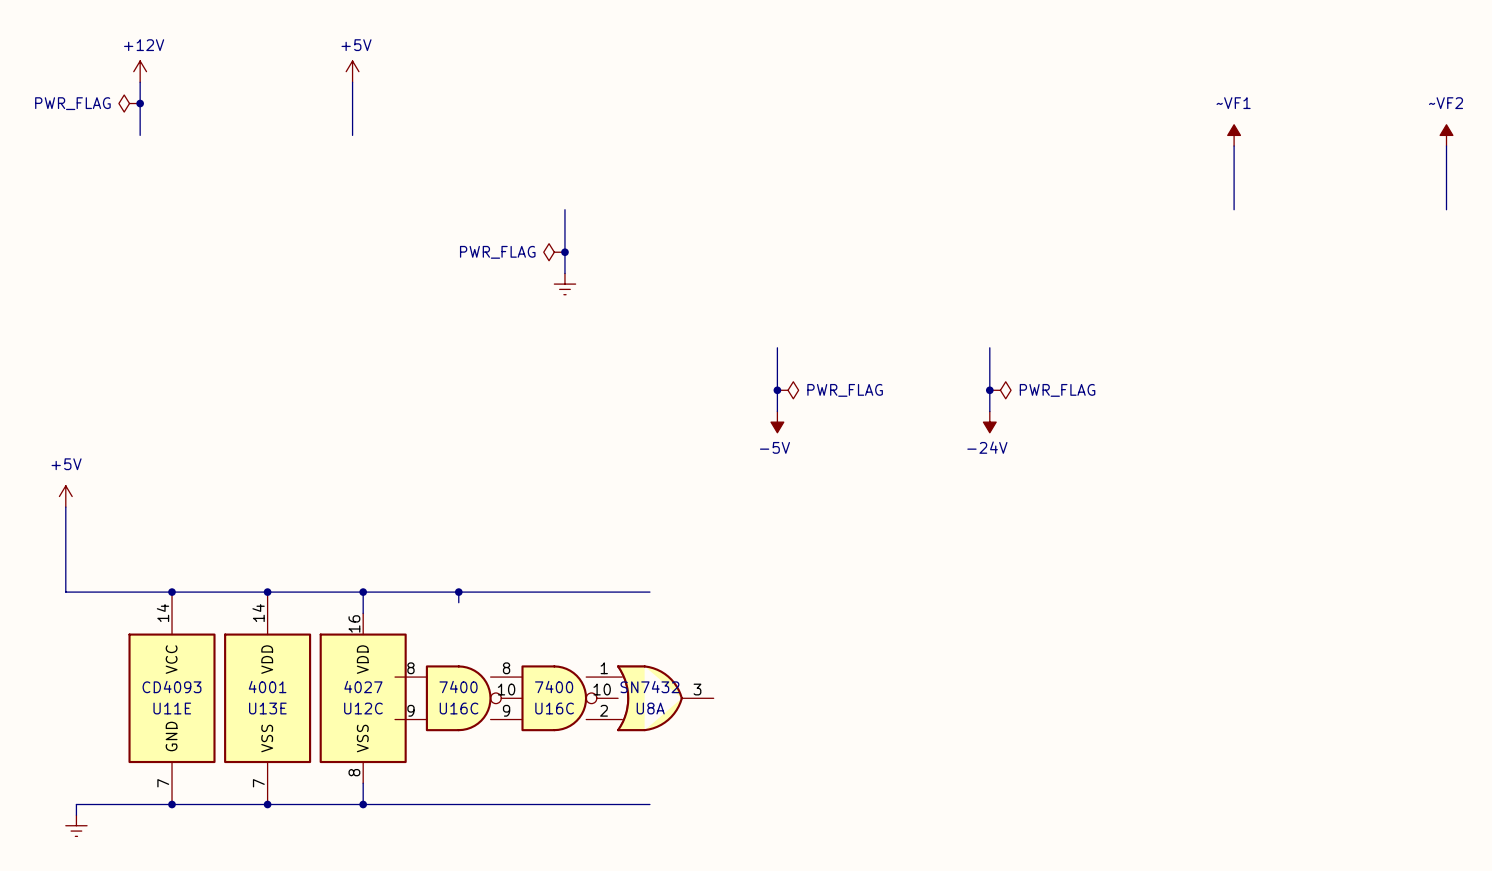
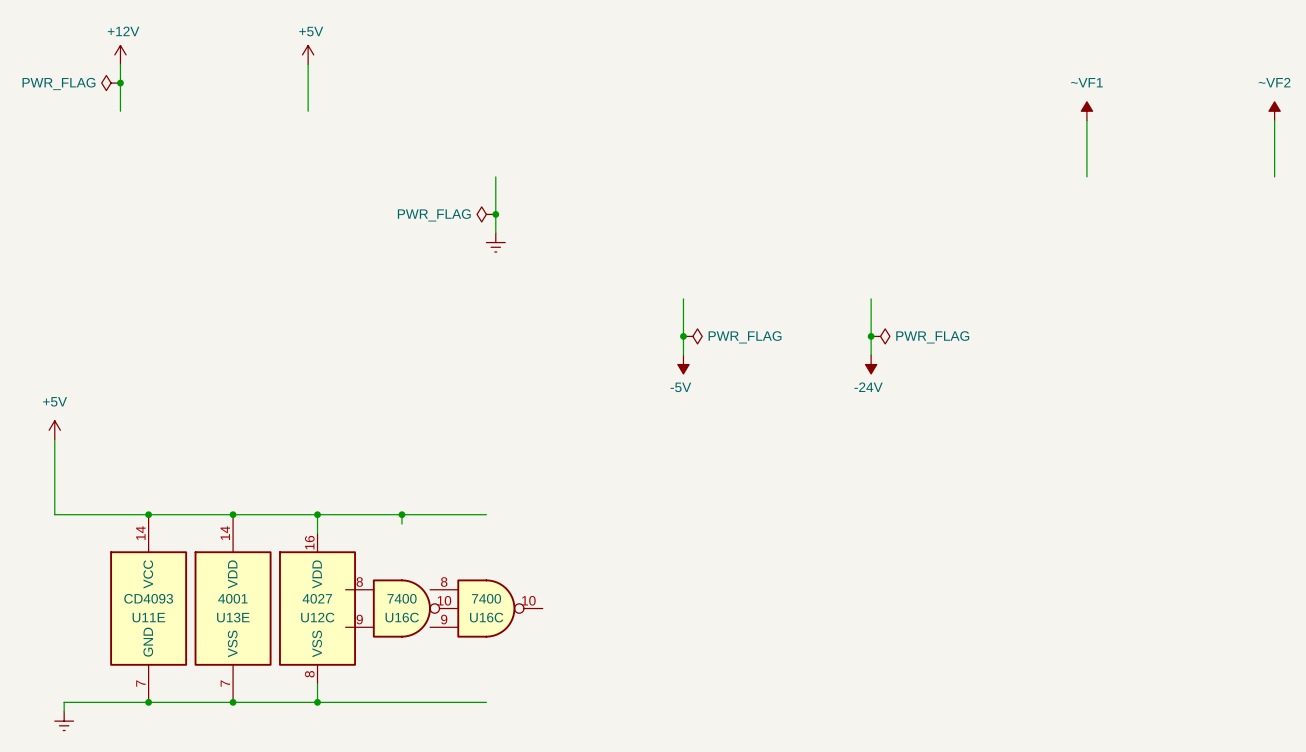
wire: (554, 592) (649, 592) -> none
U8A: SN7432 (649, 698) -> none
wire: (554, 804) (649, 804) -> none

